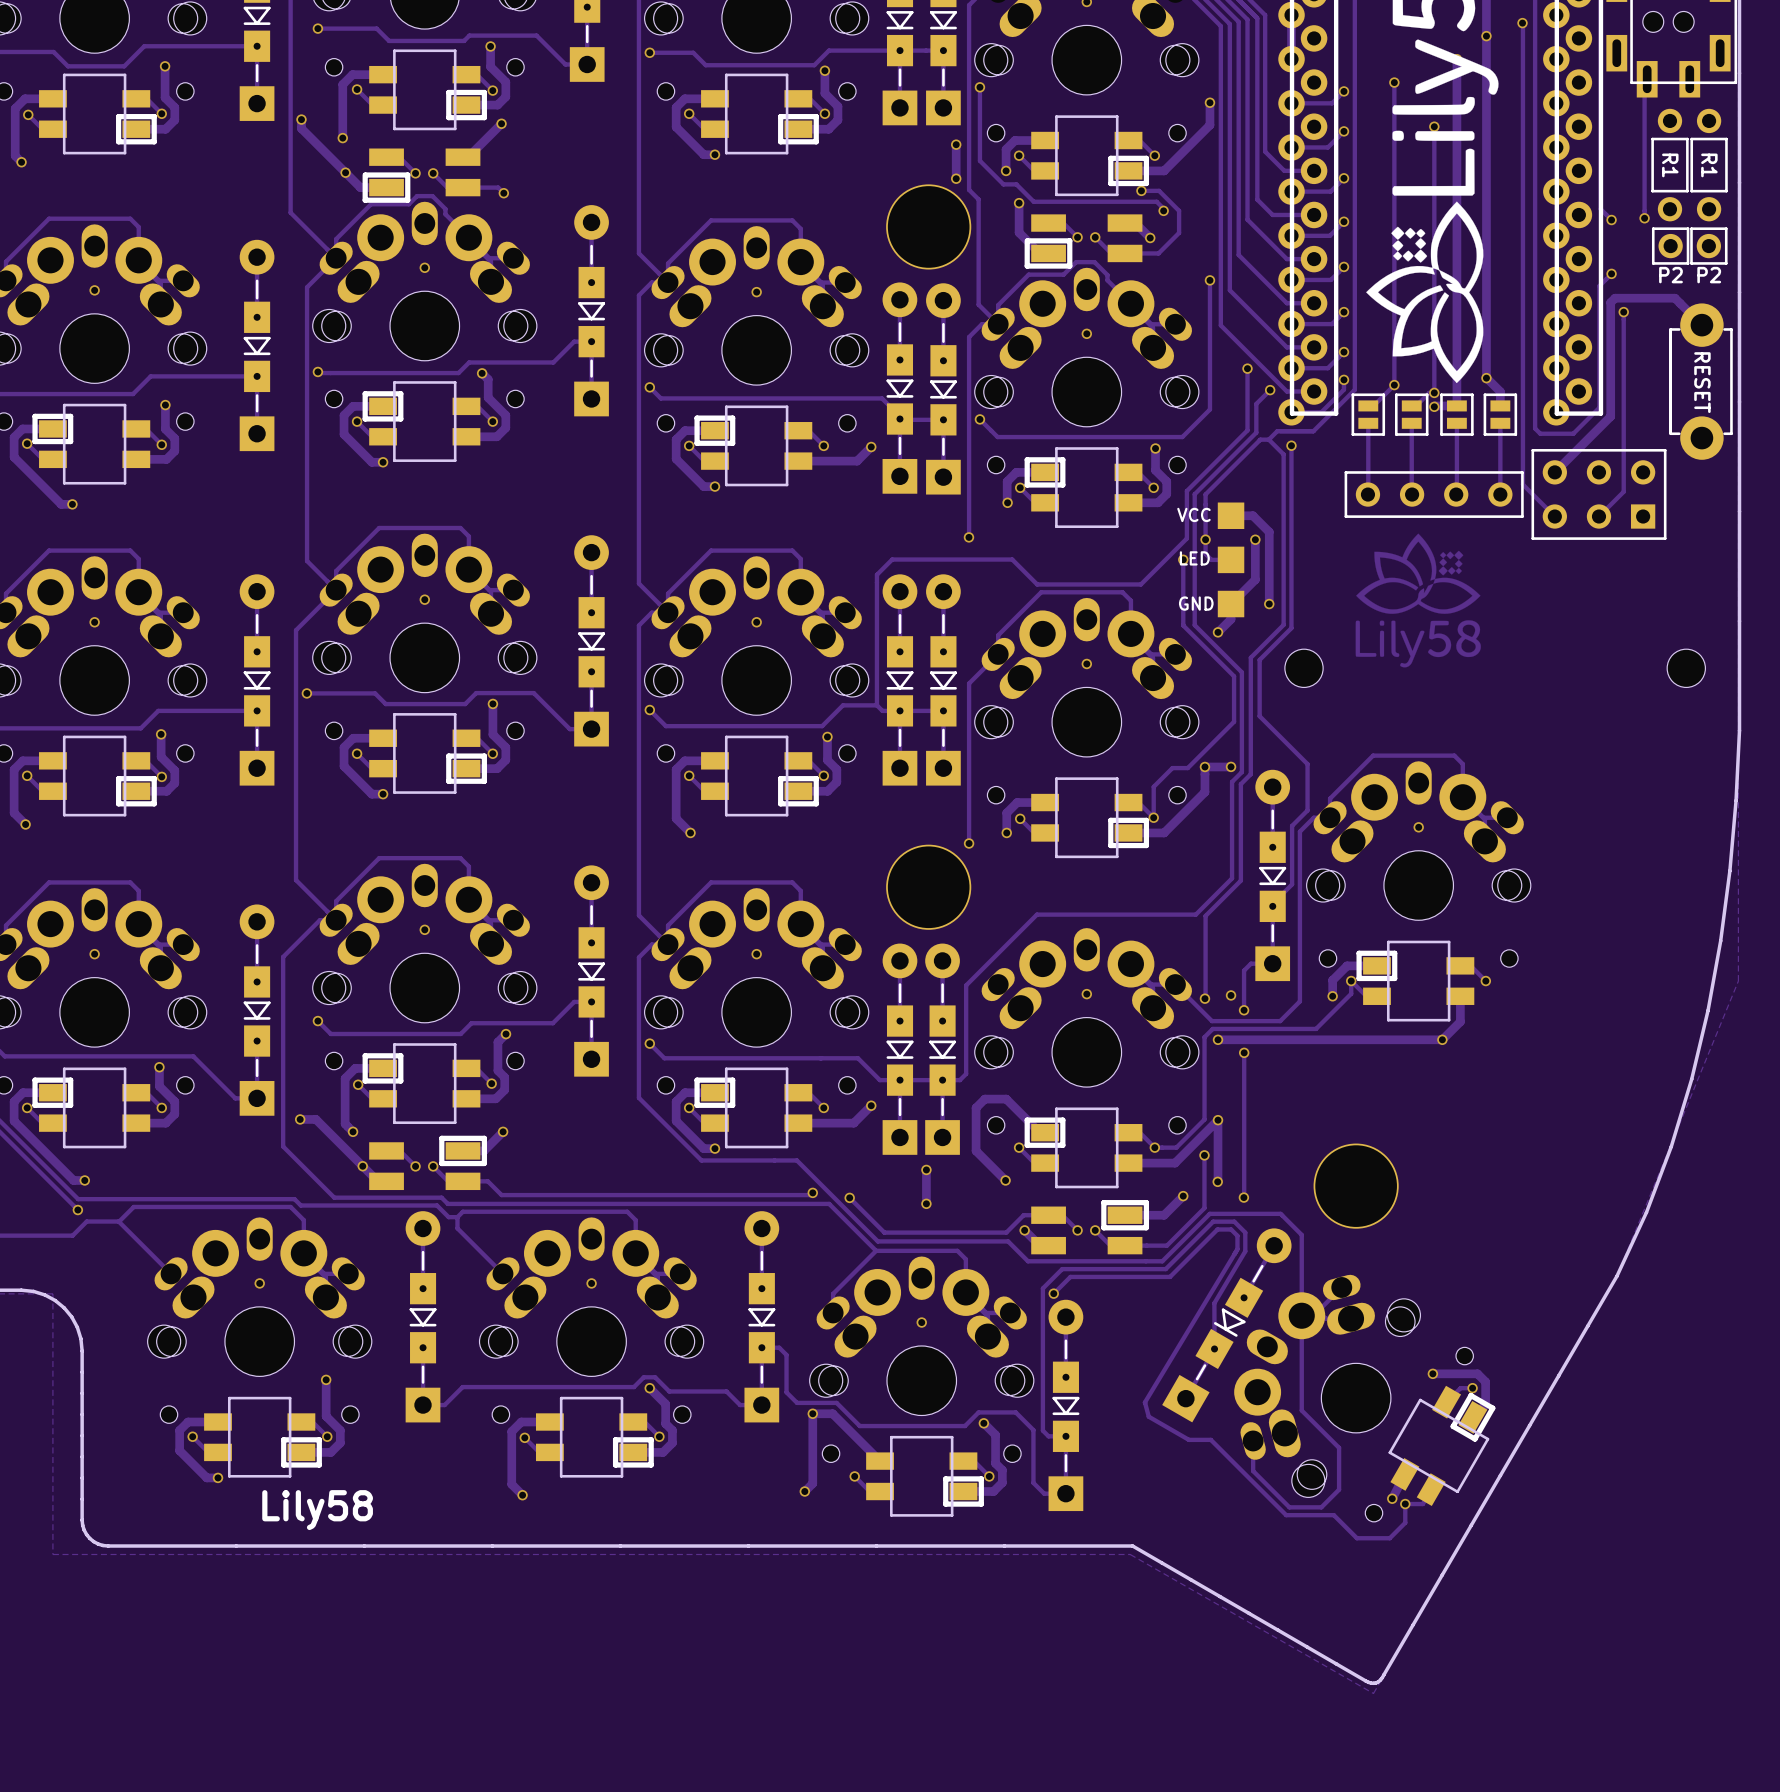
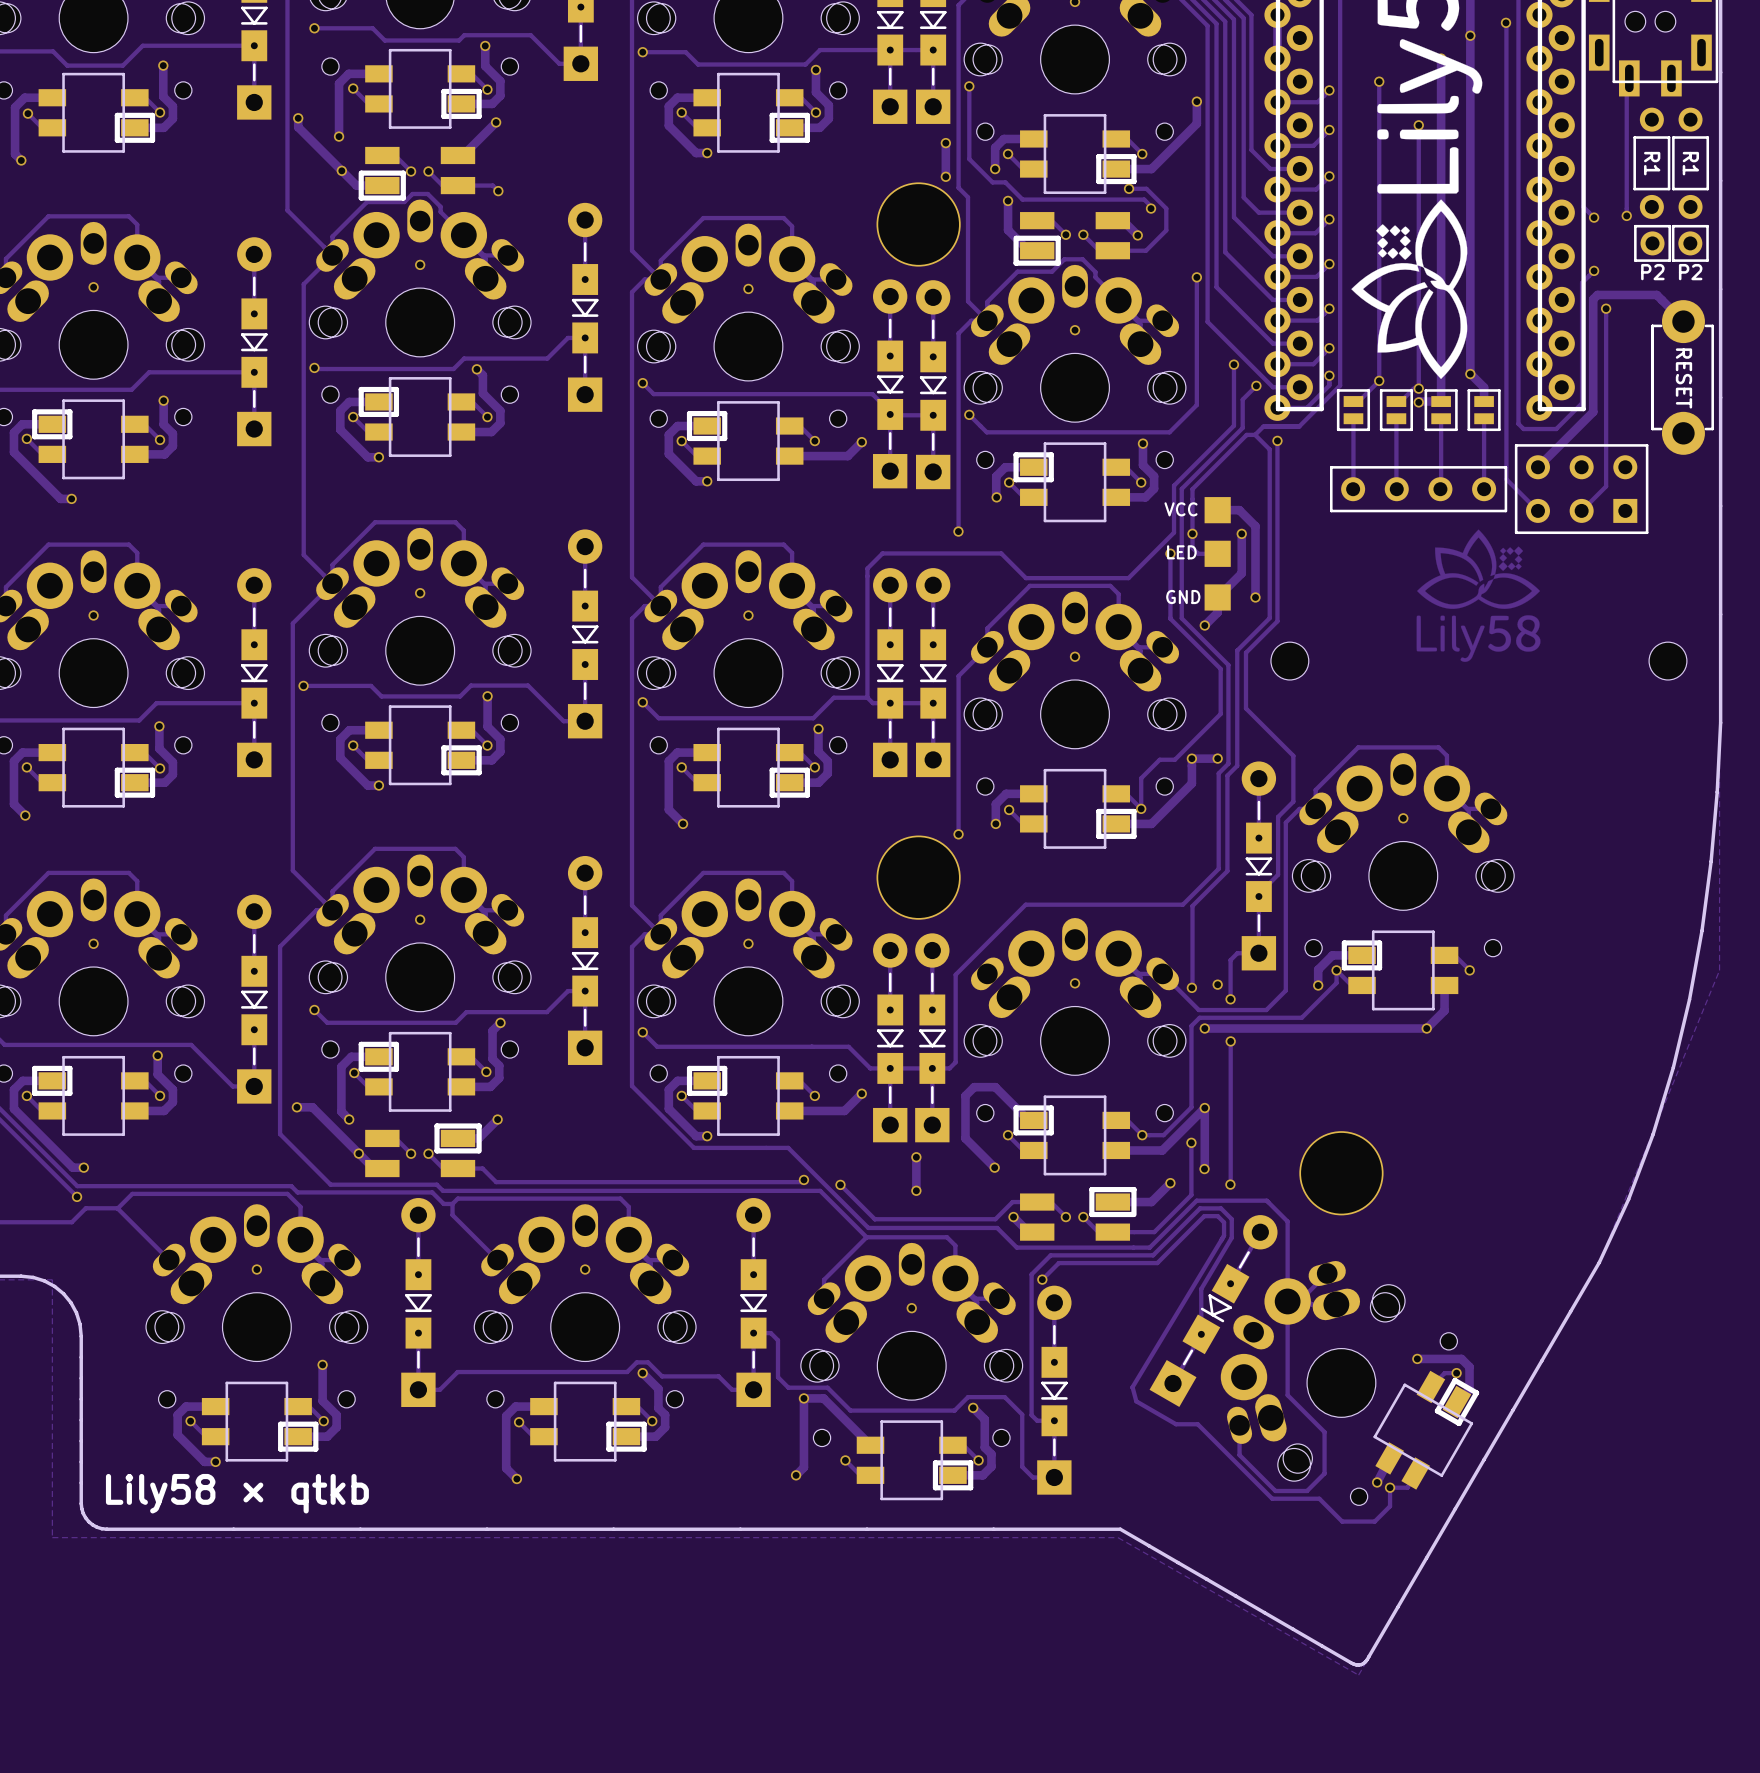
drawing position: (1418, 600) -> (1478, 595)
text: Lily58 (317, 1510) -> Lily58 × qtkb (237, 1493)

